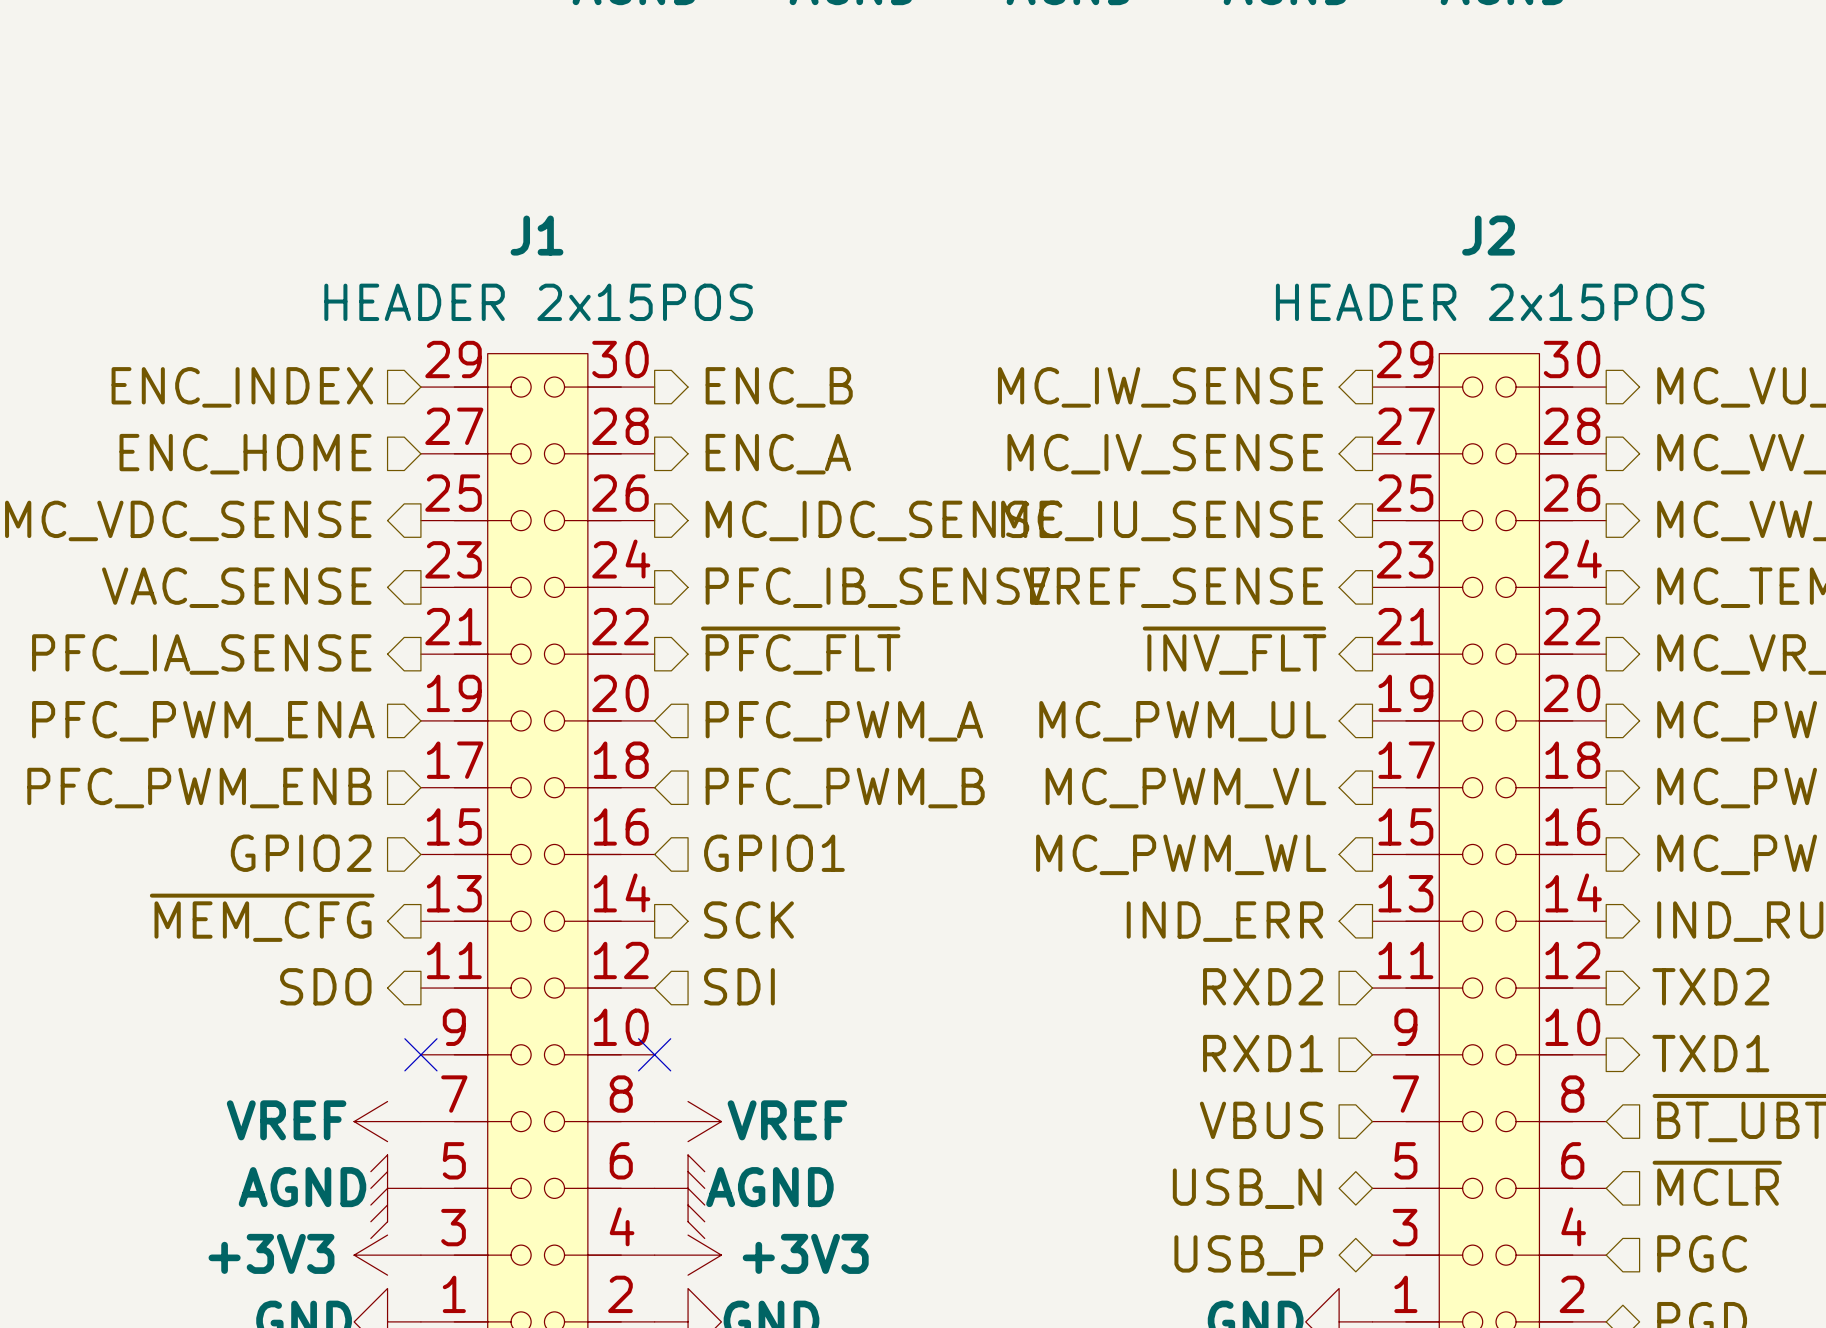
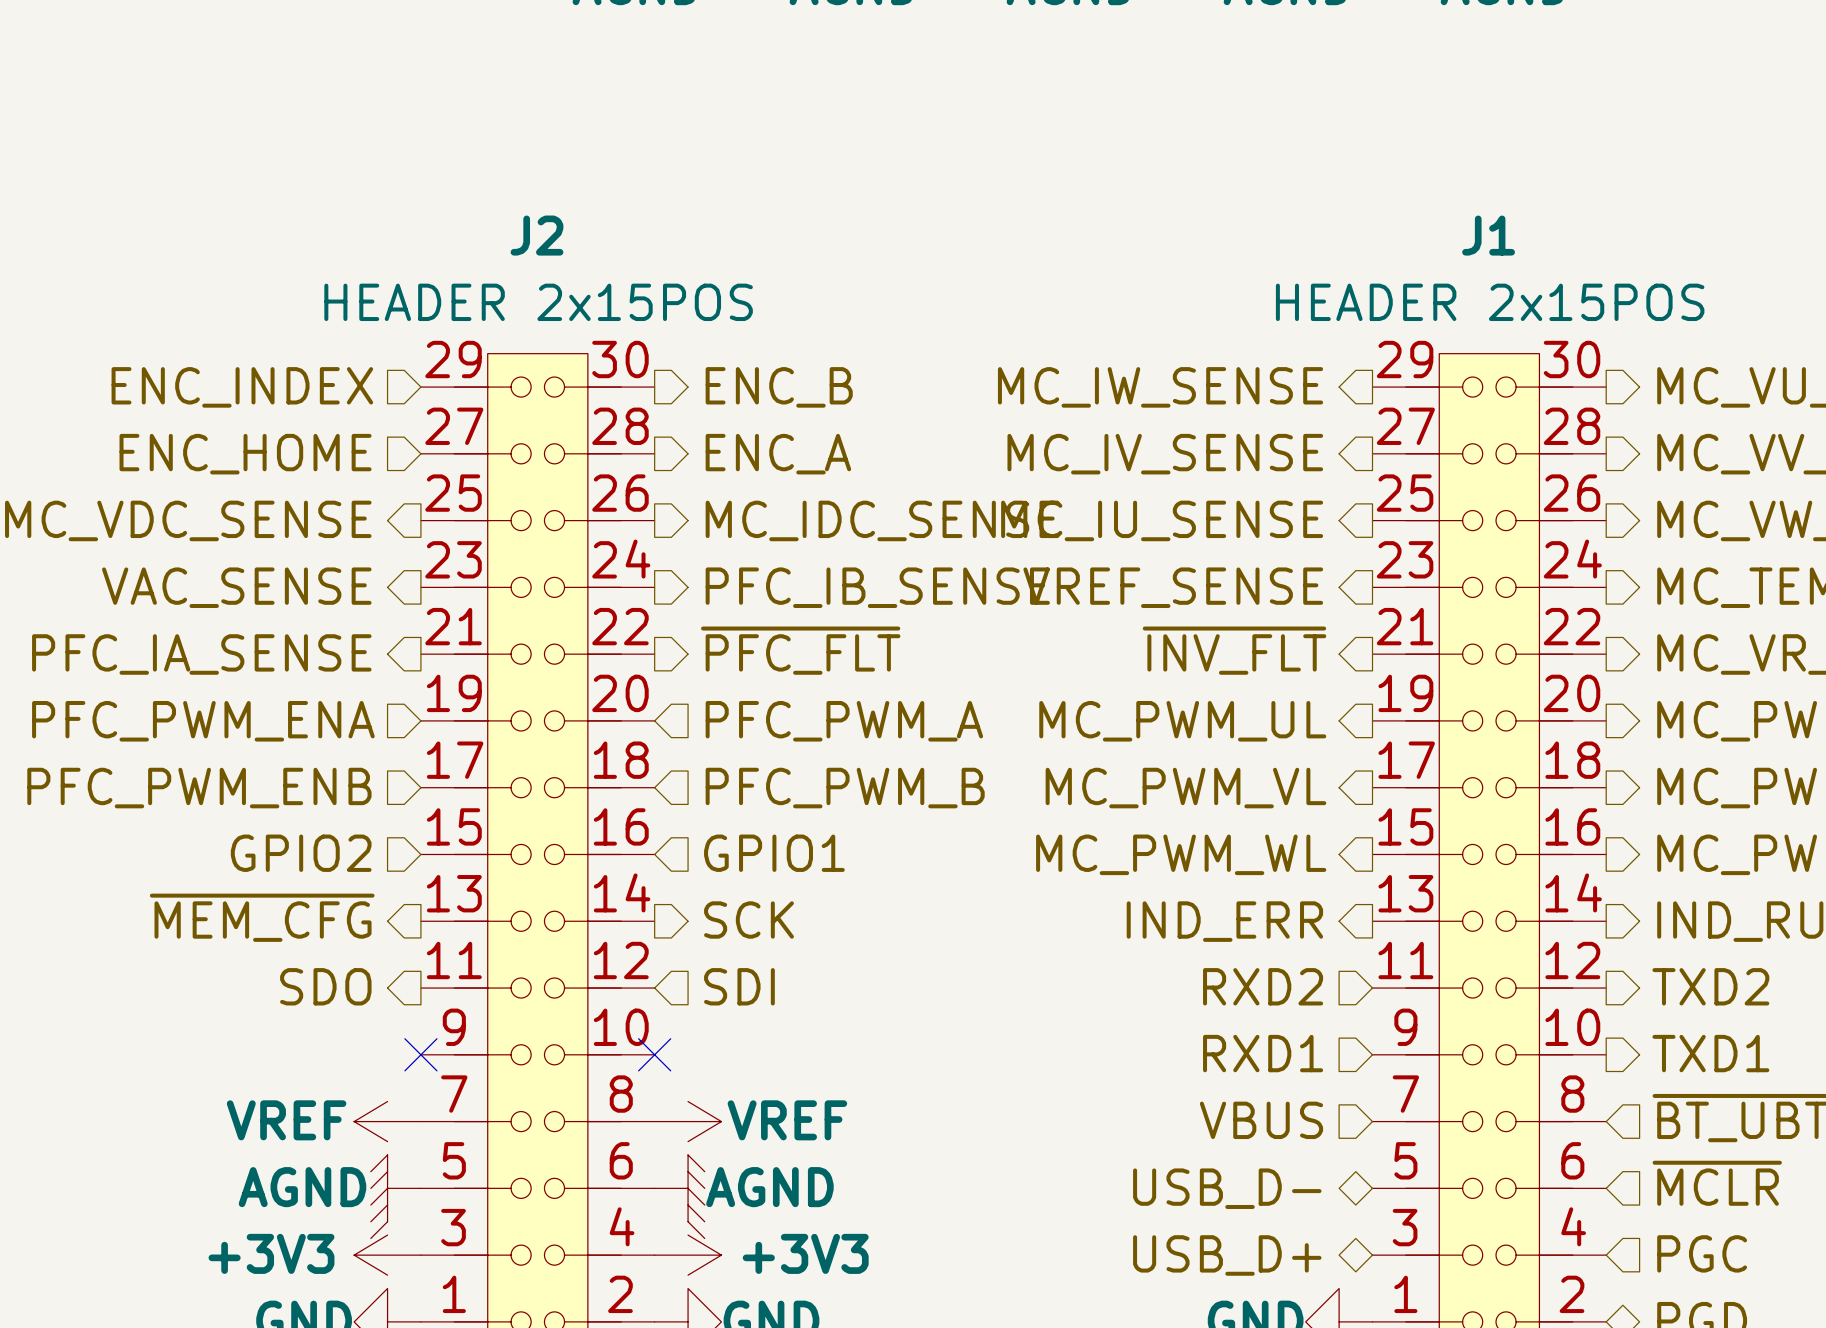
J1 name: J1 (537, 235) -> J2 (537, 235)
J2 name: J2 (1488, 235) -> J1 (1488, 235)
hierarchical label: USB_N (1247, 1188) -> USB_D- (1227, 1188)
hierarchical label: USB_P (1248, 1255) -> USB_D+ (1227, 1255)

